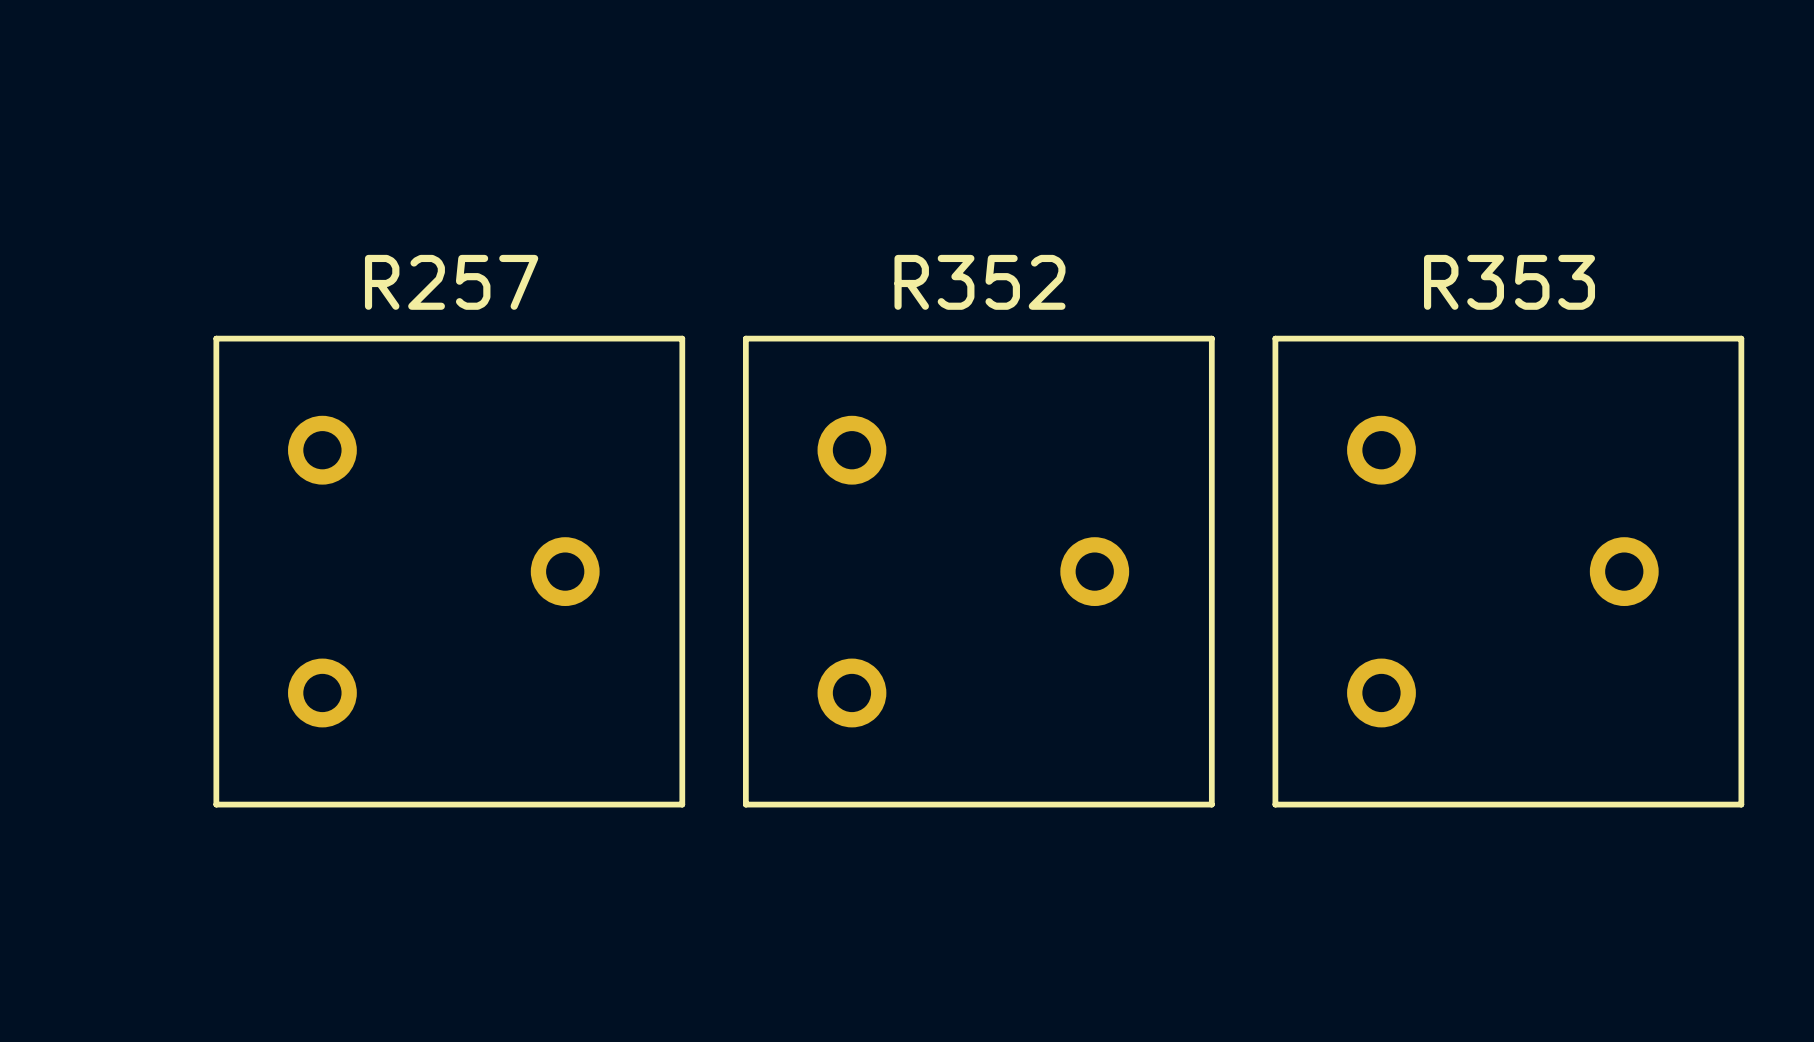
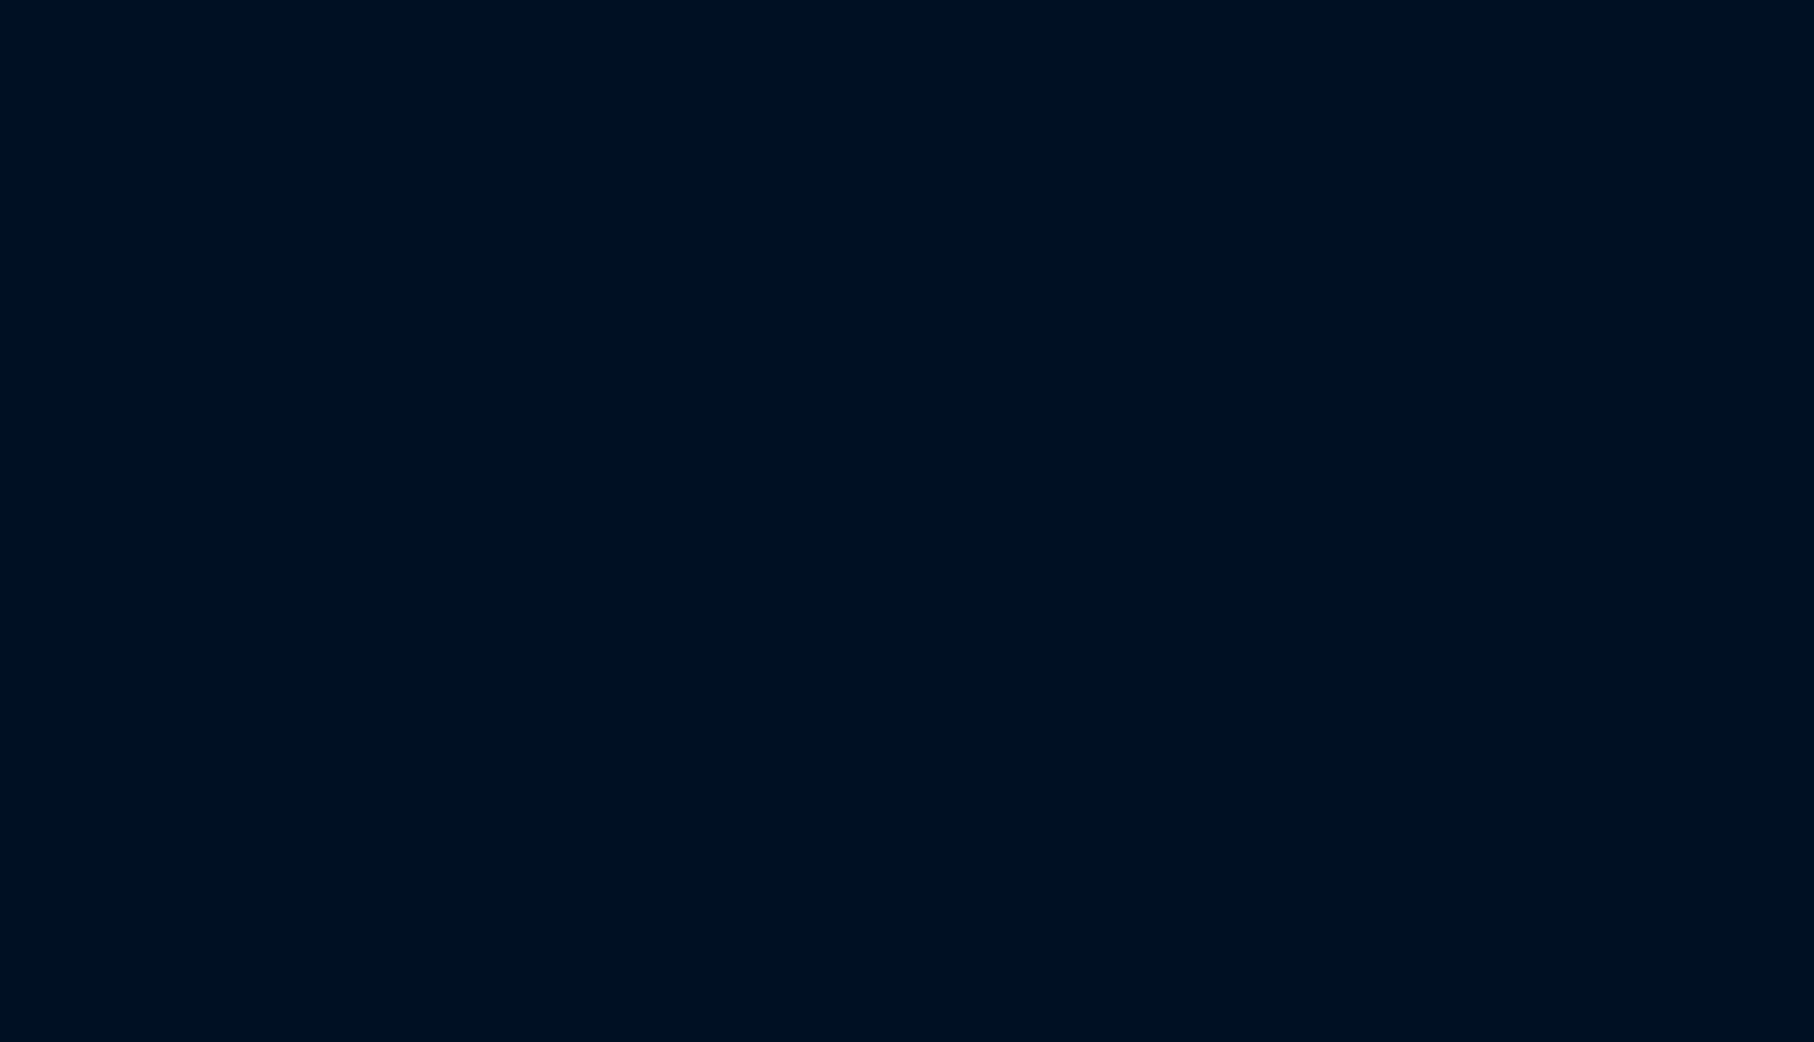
R257: (449, 571) -> none
R352: (978, 571) -> none
R353: (1508, 571) -> none

